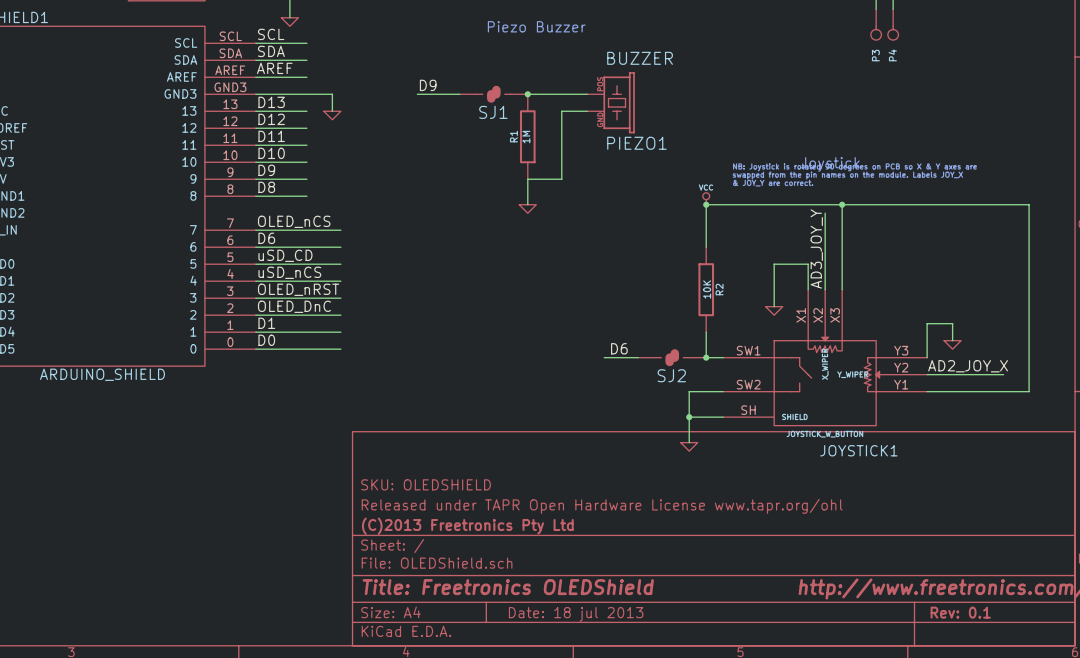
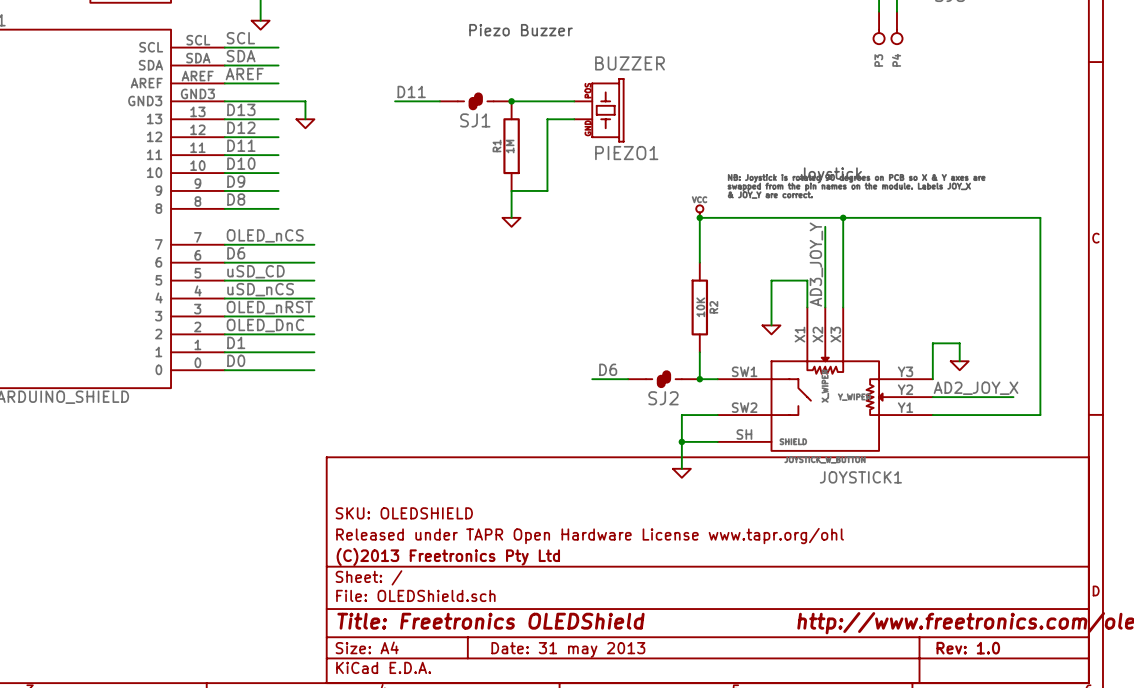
label: D9 (428, 85) -> D11 (411, 91)
title block: Rev: 0.1 (960, 612) -> Rev: 1.0 (968, 648)
title block: Date: 18 jul 2013 (576, 614) -> Date: 31 may 2013 (568, 649)

